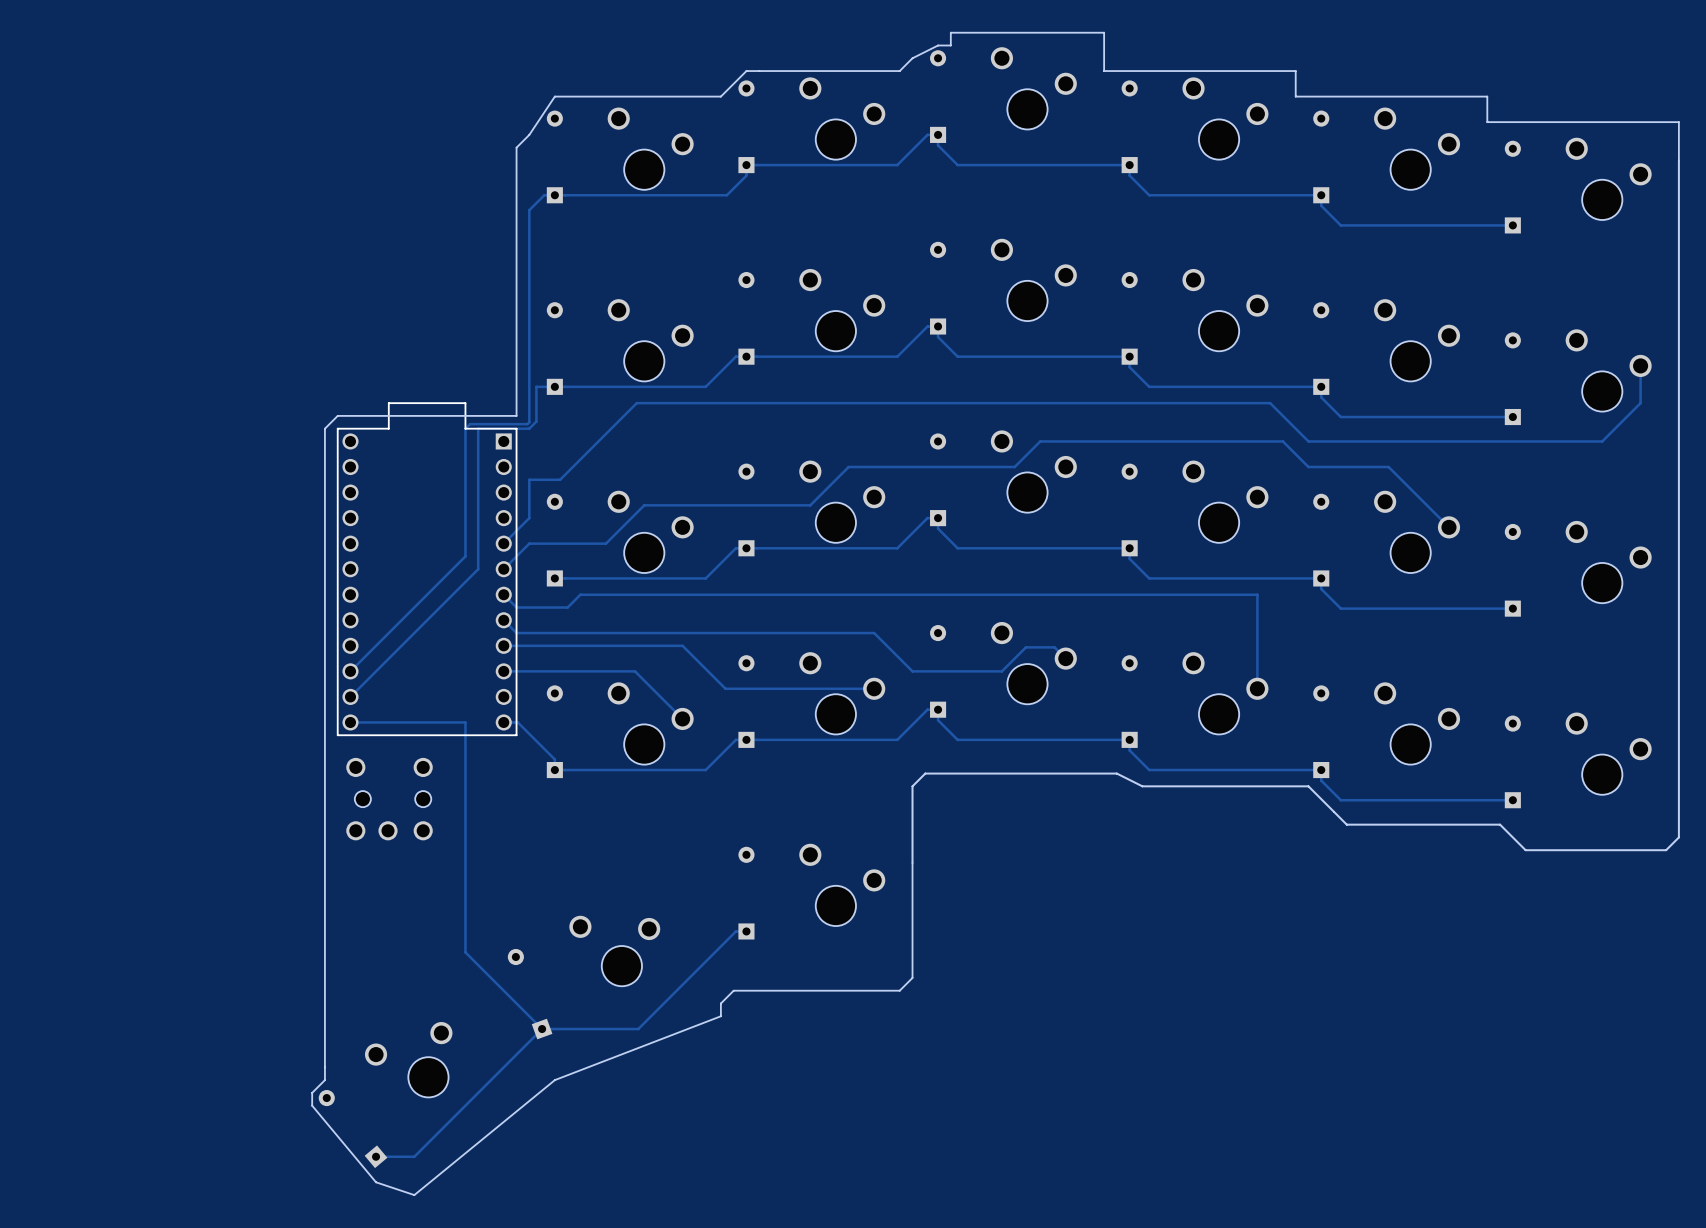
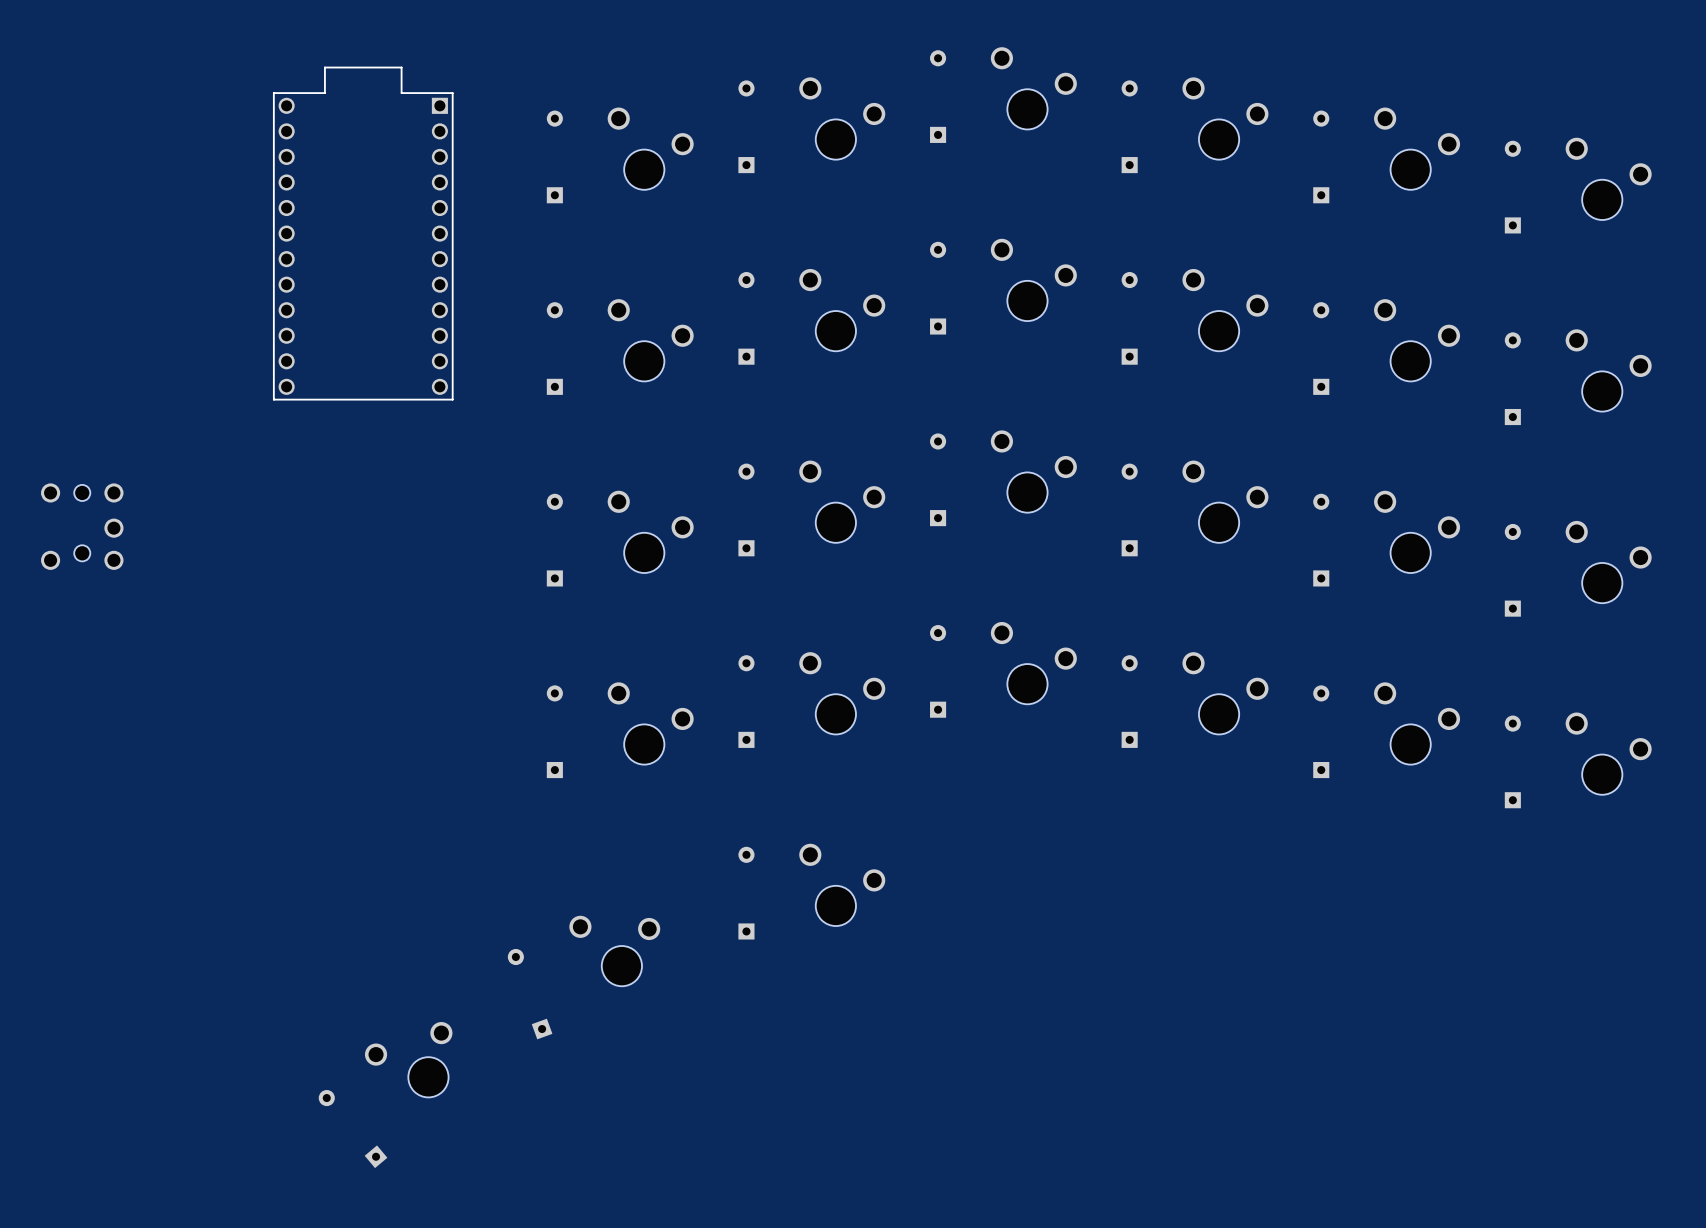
board edge: (1104, 32) (950, 32) (950, 45) (938, 45) (912, 58) (899, 71) (746, 71) (720, 96) (554, 96) (529, 134) (516, 147) (516, 415) (337, 415) (324, 428) (324, 1080) (312, 1092) (312, 1105) (376, 1182) (414, 1195) (554, 1080) (720, 1016) (720, 1003) (733, 990) (899, 990) (912, 977) (912, 786) (925, 773) (1116, 773) (1142, 786) (1308, 786) (1346, 824) (1500, 824) (1525, 850) (1666, 850) (1678, 837) (1678, 122) (1487, 122) (1487, 96) (1295, 96) (1295, 71) (1104, 71) (1104, 32) -> none
track: (1512, 225) (1340, 225) (1321, 205) (1321, 195) (1149, 195) (1129, 175) (1129, 165) (957, 165) (938, 145) (938, 134) (927, 134) (897, 165) (746, 165) (746, 175) (726, 195) (544, 195) (529, 210) (529, 422) (527, 424) (469, 424) (465, 428) (465, 556) (350, 671) -> none
part: none -> (363, 233)
track: (1640, 365) (1640, 403) (1602, 441) (1308, 441) (1270, 403) (636, 403) (560, 479) (529, 479) (529, 518) (503, 543) -> none
track: (1512, 417) (1340, 417) (1321, 397) (1321, 386) (1149, 386) (1129, 367) (1129, 356) (957, 356) (938, 337) (938, 326) (927, 326) (897, 356) (735, 356) (705, 386) (536, 386) (536, 421) (529, 428) (478, 428) (478, 569) (350, 696) -> none
part: none -> (82, 526)
track: (1448, 527) (1388, 467) (1308, 467) (1282, 441) (1040, 441) (1014, 467) (848, 467) (810, 505) (644, 505) (605, 543) (529, 543) (503, 569) -> none
part: (427, 569) -> none
track: (554, 578) (705, 578) (735, 548) (897, 548) (927, 518) (938, 518) (938, 528) (957, 548) (1129, 548) (1129, 558) (1149, 578) (1321, 578) (1321, 589) (1340, 608) (1512, 608) -> none
track: (503, 594) (516, 607) (567, 607) (580, 594) (1257, 594) (1257, 688) (1252, 684) -> none
track: (503, 620) (516, 633) (874, 633) (912, 671) (1001, 671) (1025, 647) (1054, 647) (1065, 658) -> none
track: (503, 645) (682, 645) (725, 688) (874, 688) -> none
track: (503, 671) (635, 671) (682, 718) -> none
track: (350, 722) (465, 722) (465, 952) (542, 1029) -> none
track: (503, 722) (517, 722) (554, 759) (554, 770) (705, 770) (735, 739) (897, 739) (927, 709) (938, 709) (938, 720) (957, 739) (1129, 739) (1129, 750) (1149, 770) (1321, 770) (1321, 780) (1340, 800) (1512, 800) -> none
part: (389, 799) -> none
track: (746, 931) (735, 931) (638, 1029) (542, 1029) -> none
track: (542, 1029) (414, 1156) (376, 1156) -> none

